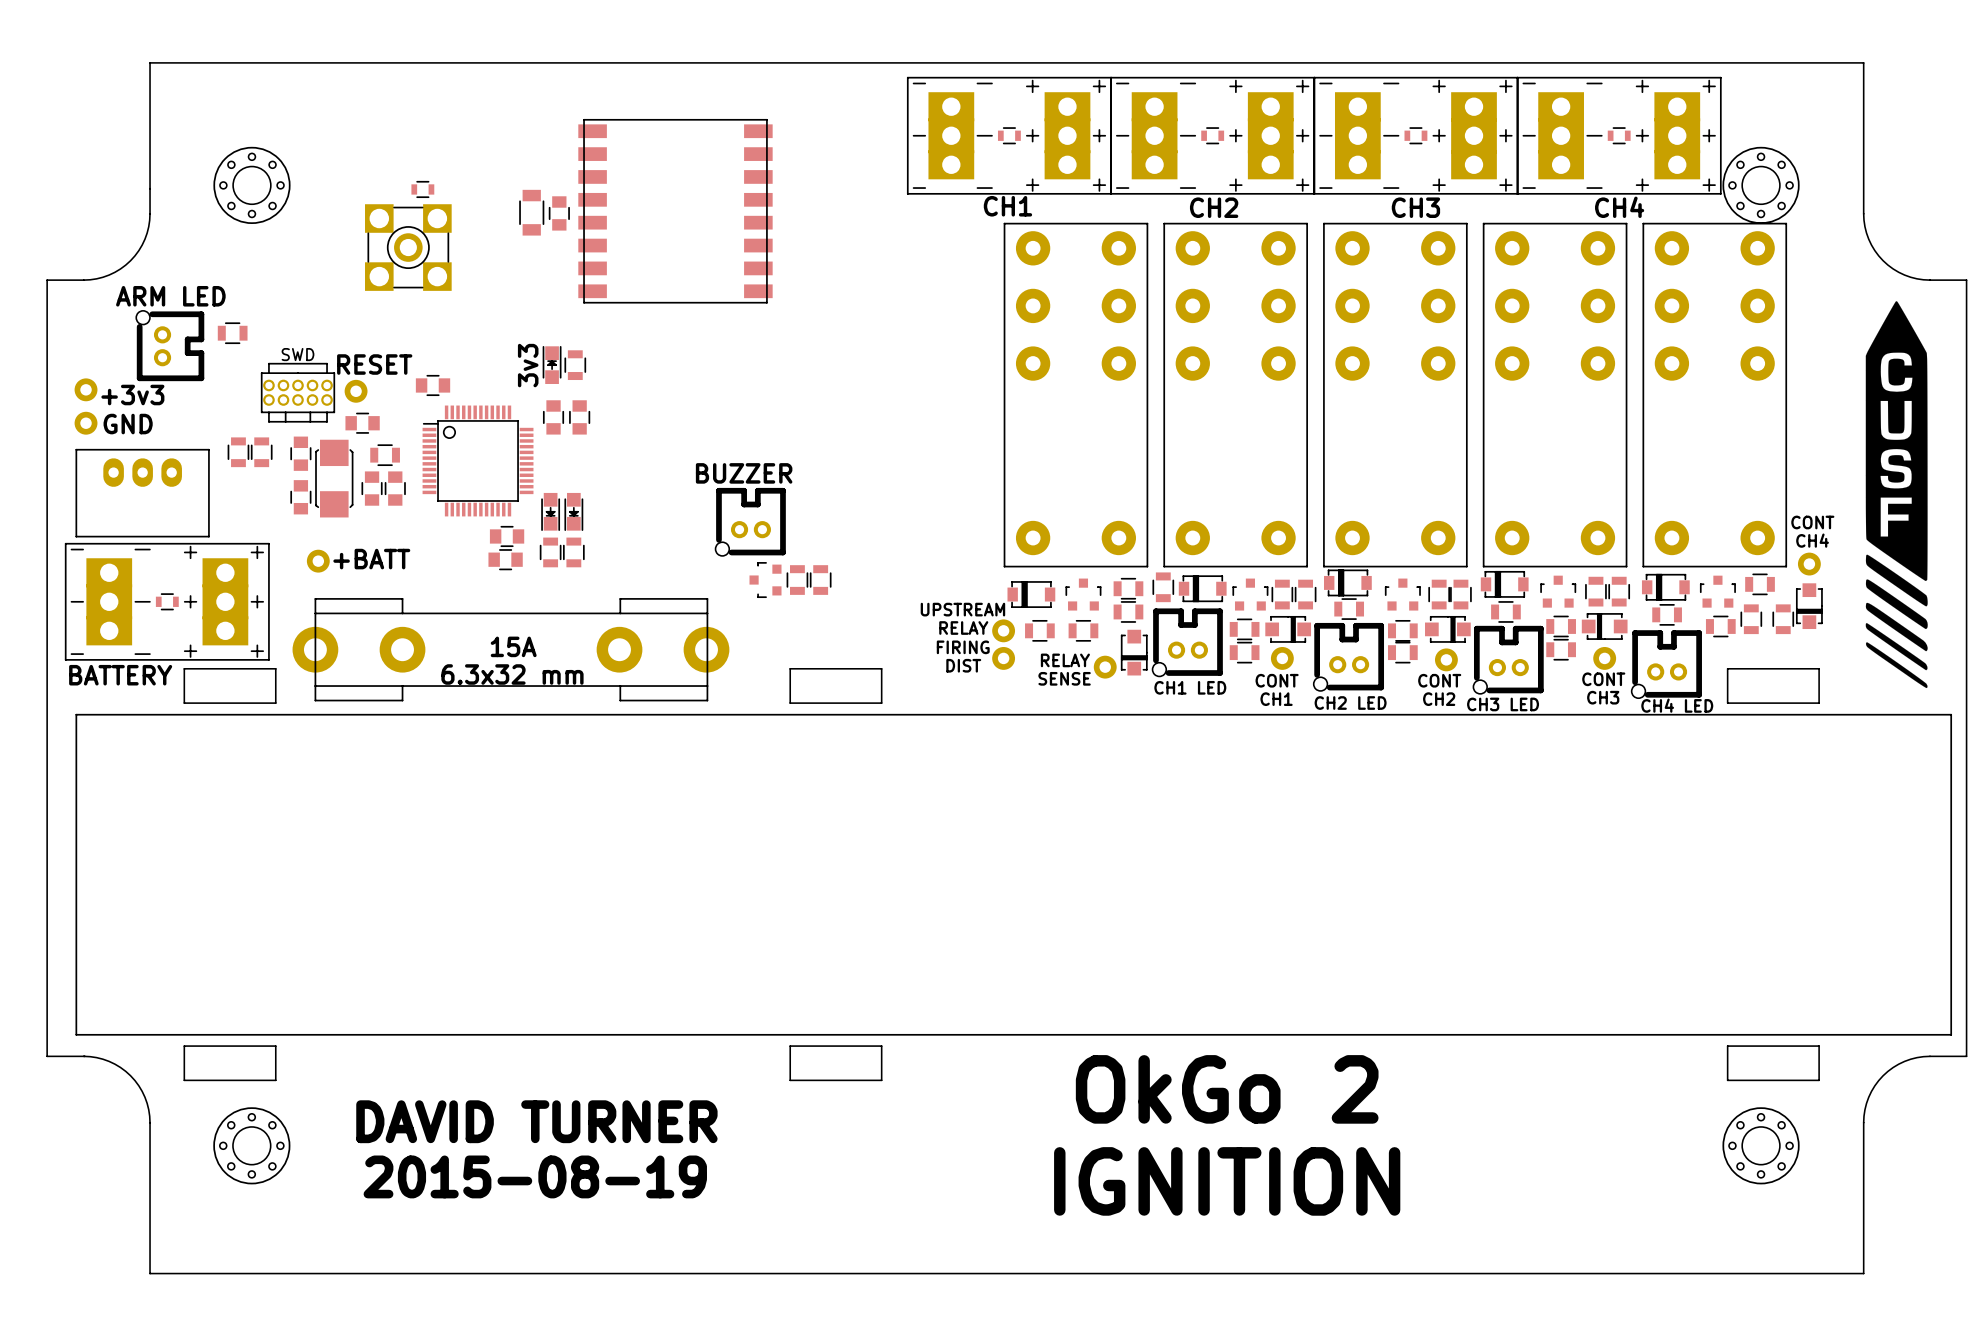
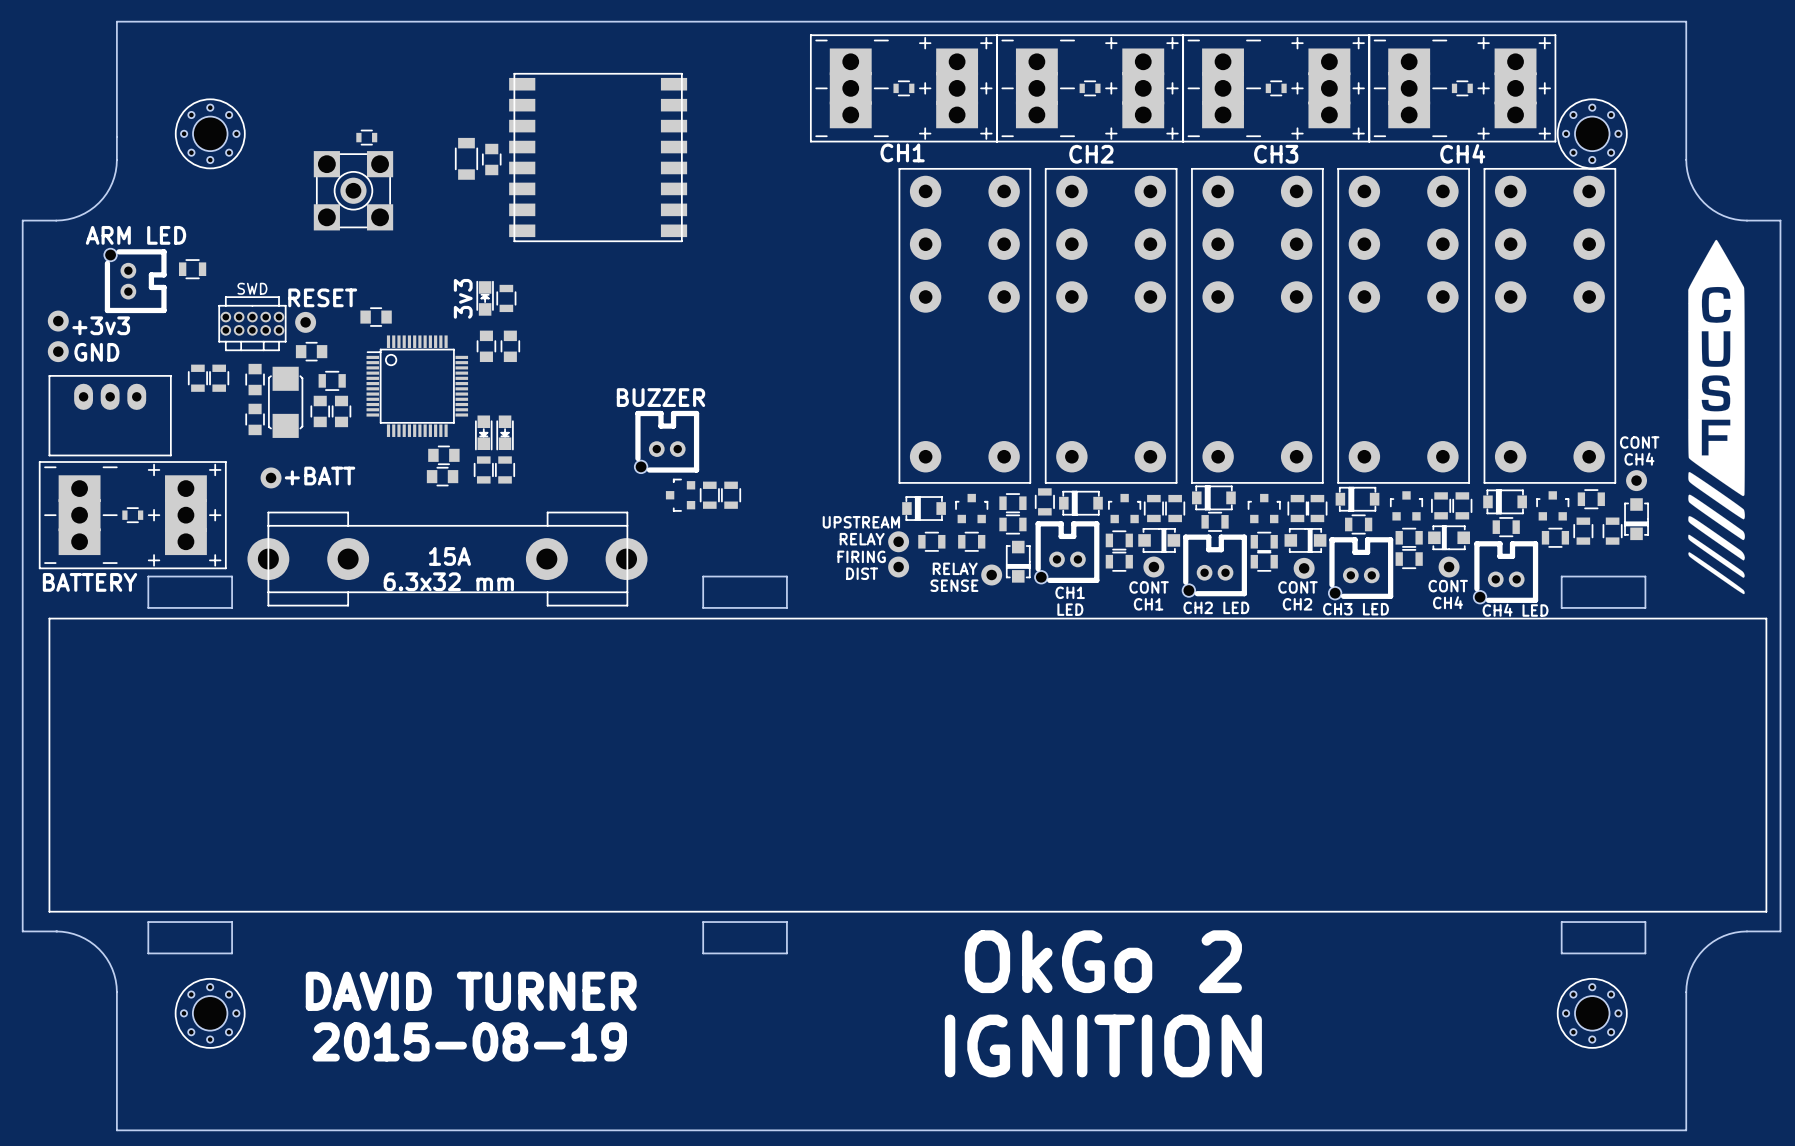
text: CH1 LED (1190, 687) -> CH1 (1070, 592)
text: CH3 (1603, 697) -> CH4 (1447, 602)
text: none -> LED (1070, 609)

